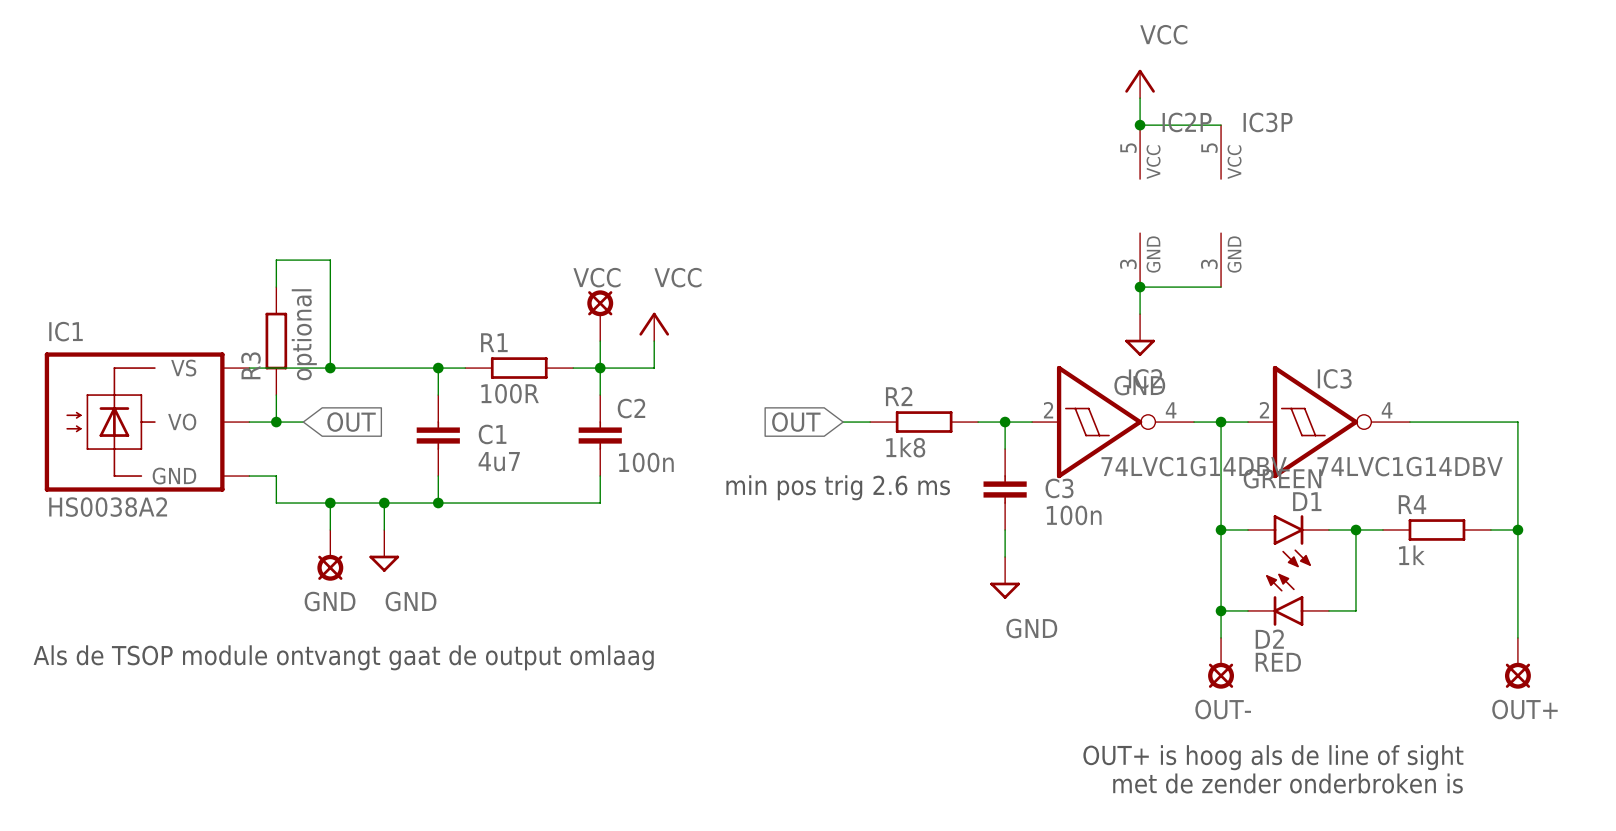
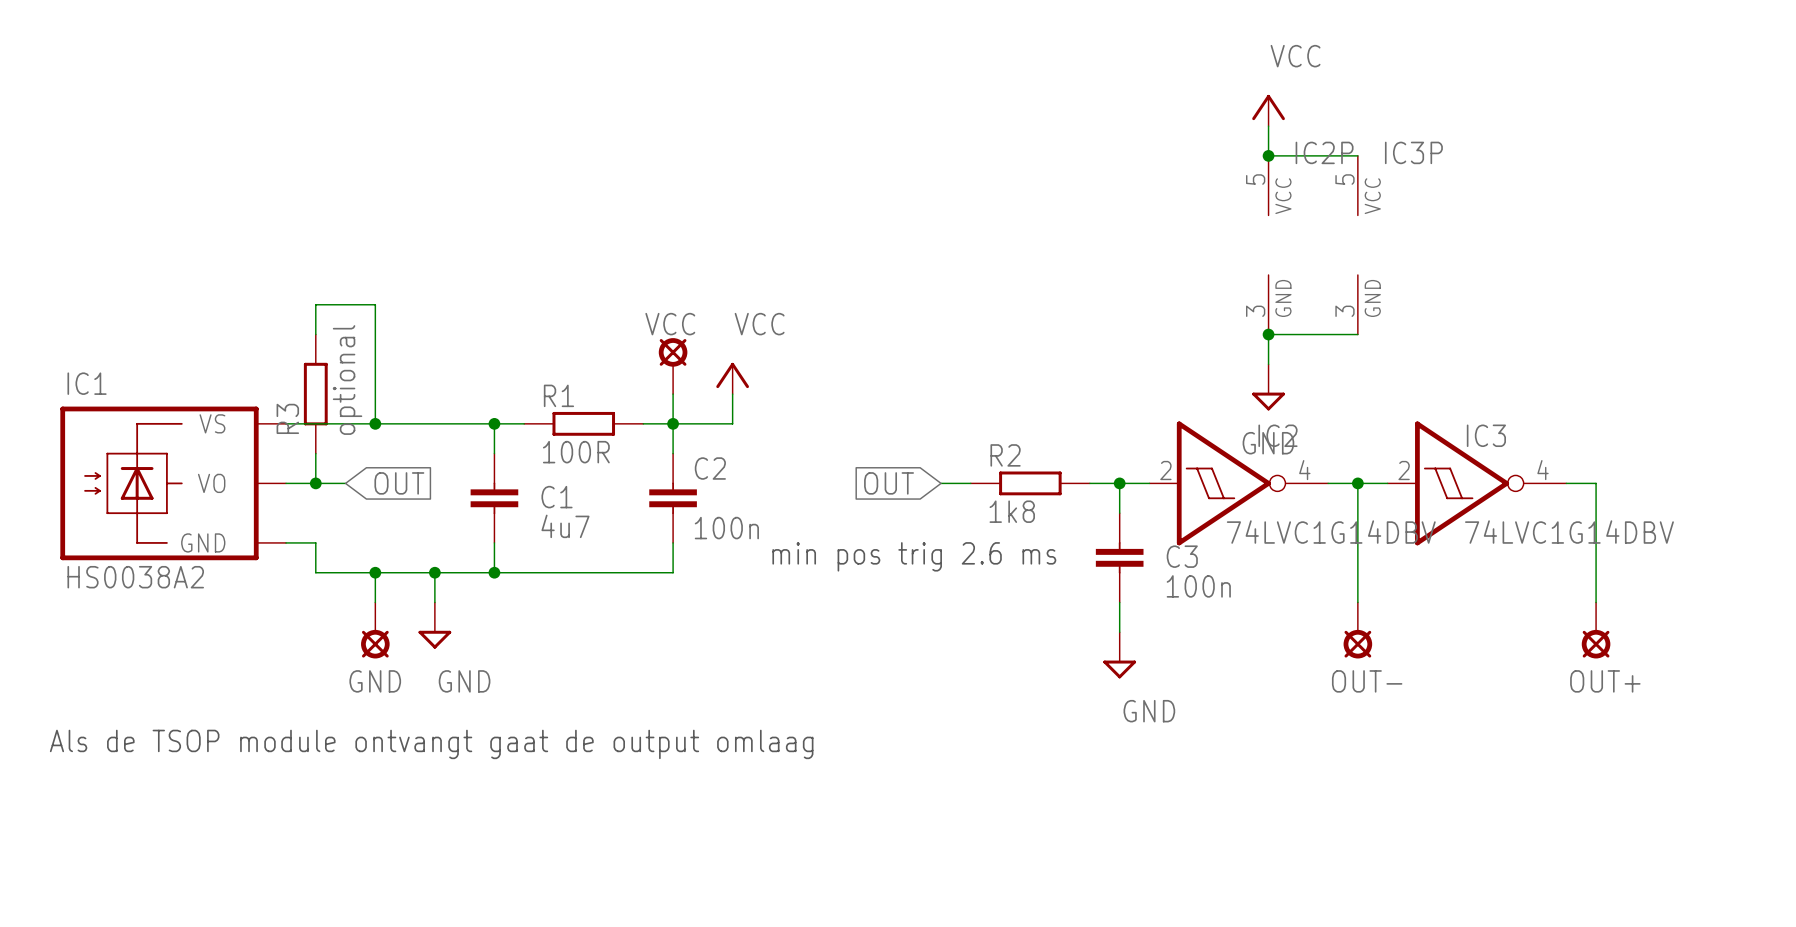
wire: (1436, 422) (1517, 422) (1517, 637) -> (1596, 483) (1596, 602)
junction: (1221, 530) -> none
wire: (1248, 530) (1221, 530) (1221, 637) -> none
wire: (1329, 530) (1382, 530) -> none
wire: (1355, 530) (1355, 610) (1329, 610) -> none
junction: (1355, 530) -> none
R4: 1k (1436, 530) -> none
wire: (1490, 530) (1517, 530) -> none
junction: (1517, 530) -> none
D1: GREEN (1288, 541) -> none
D2: RED (1288, 599) -> none
wire: (1221, 610) (1248, 610) -> none
junction: (1221, 610) -> none
OUT- position: (1221, 663) -> (1357, 630)
OUT+ position: (1517, 663) -> (1596, 630)
text: OUT+ is hoog als de line of sight (1273, 757) -> none
text: met de zender onderbroken is (1288, 783) -> none

